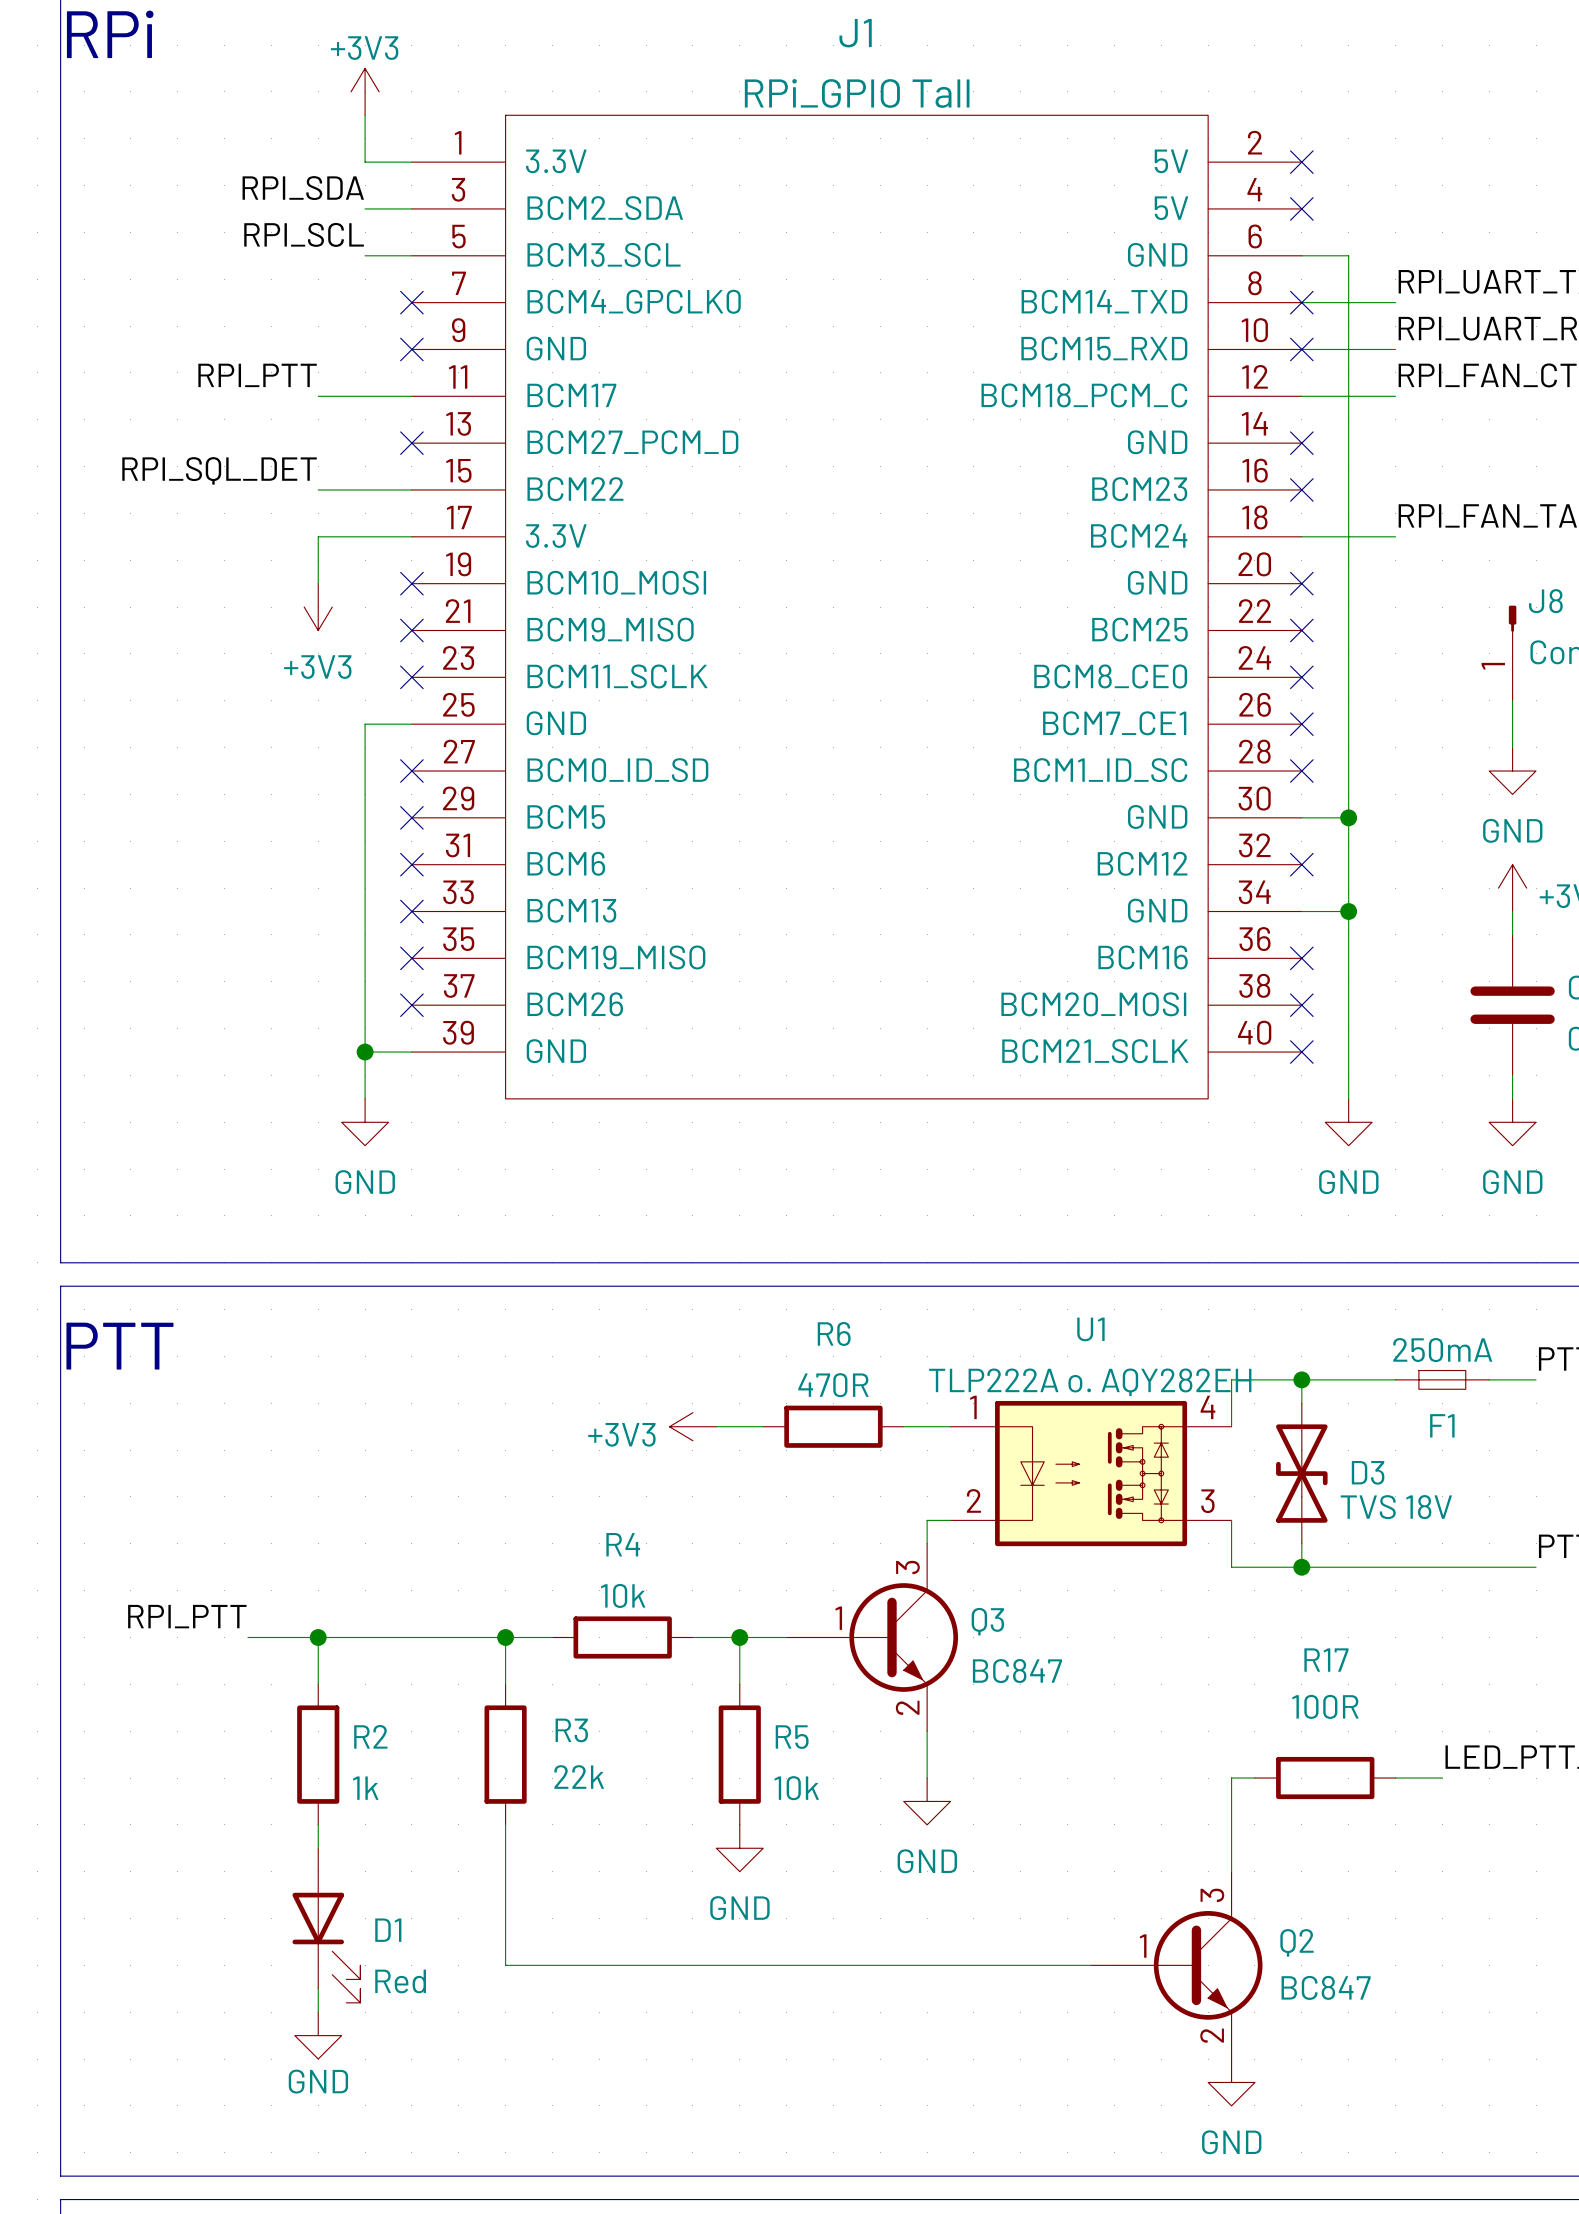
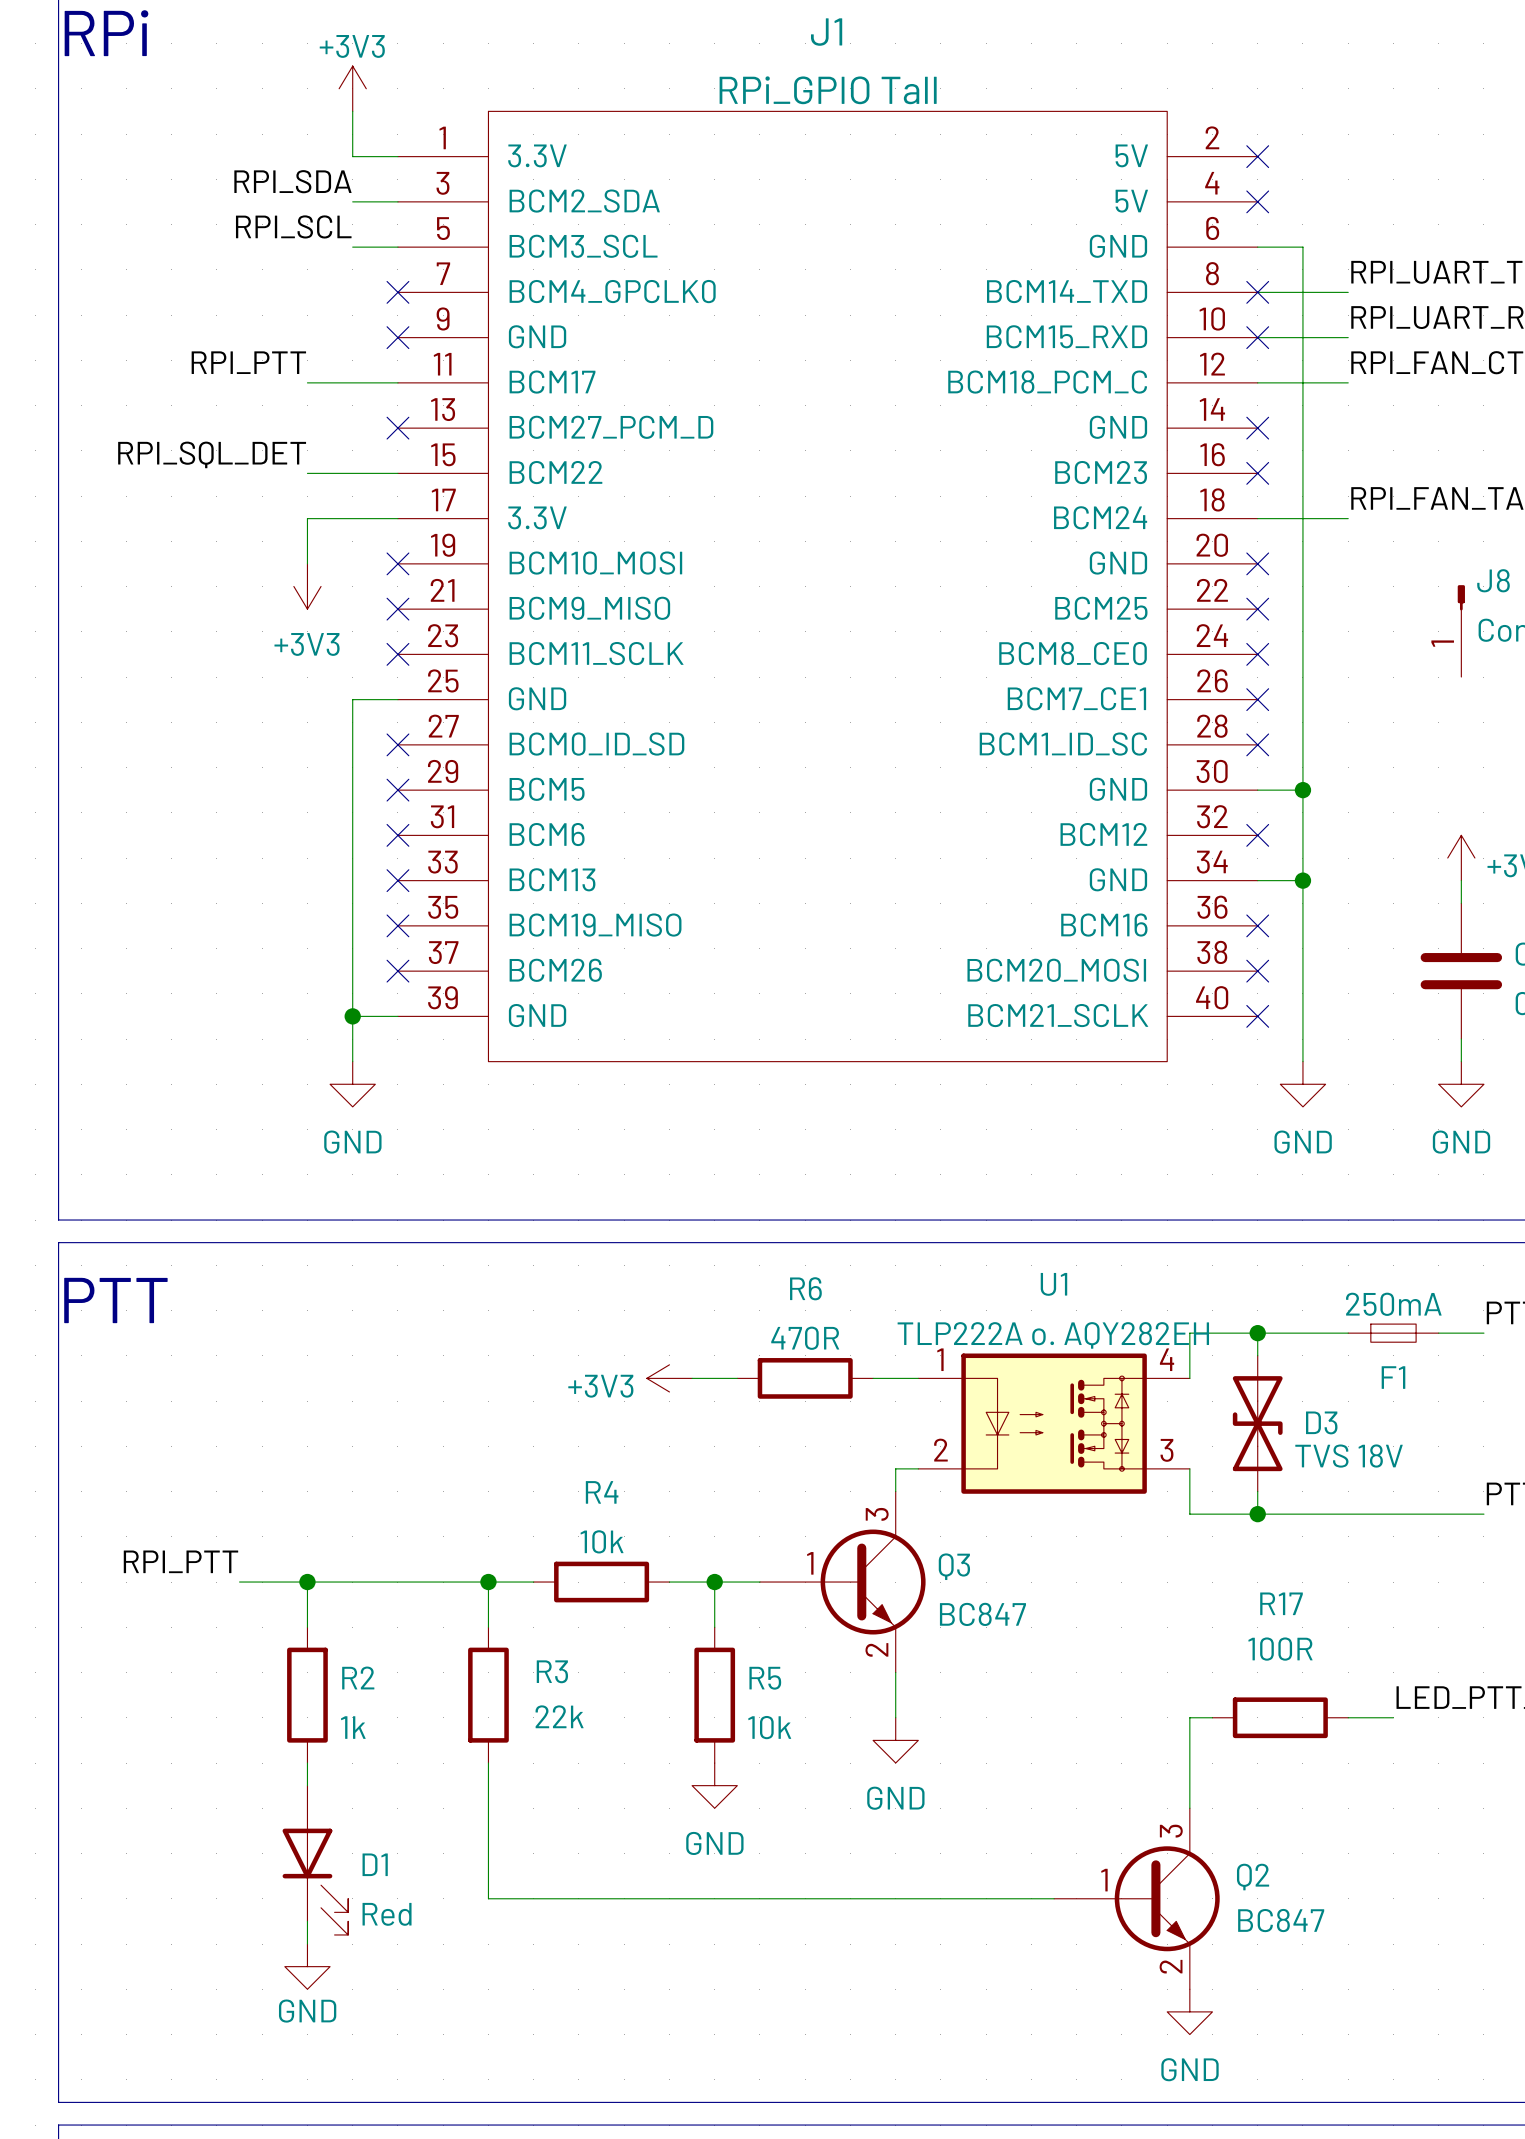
wire: (1512, 700) (1512, 747) -> none
power symbol: GND (1512, 771) -> none

